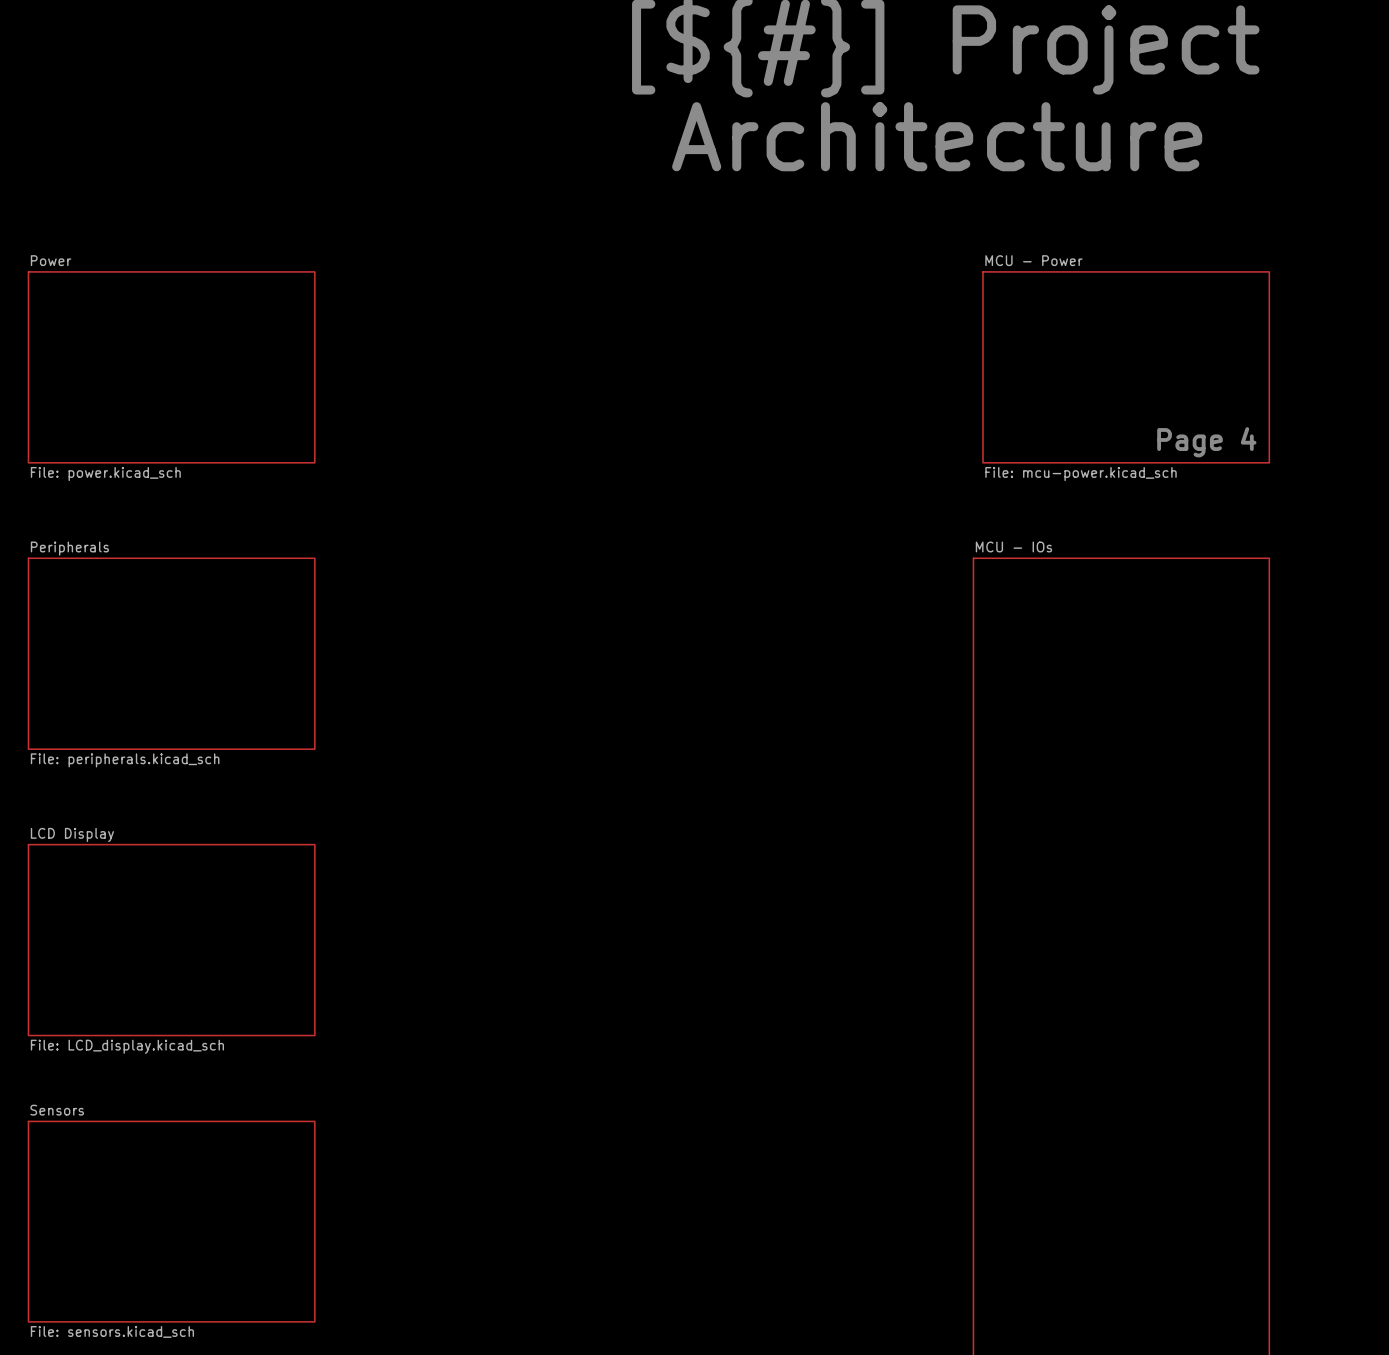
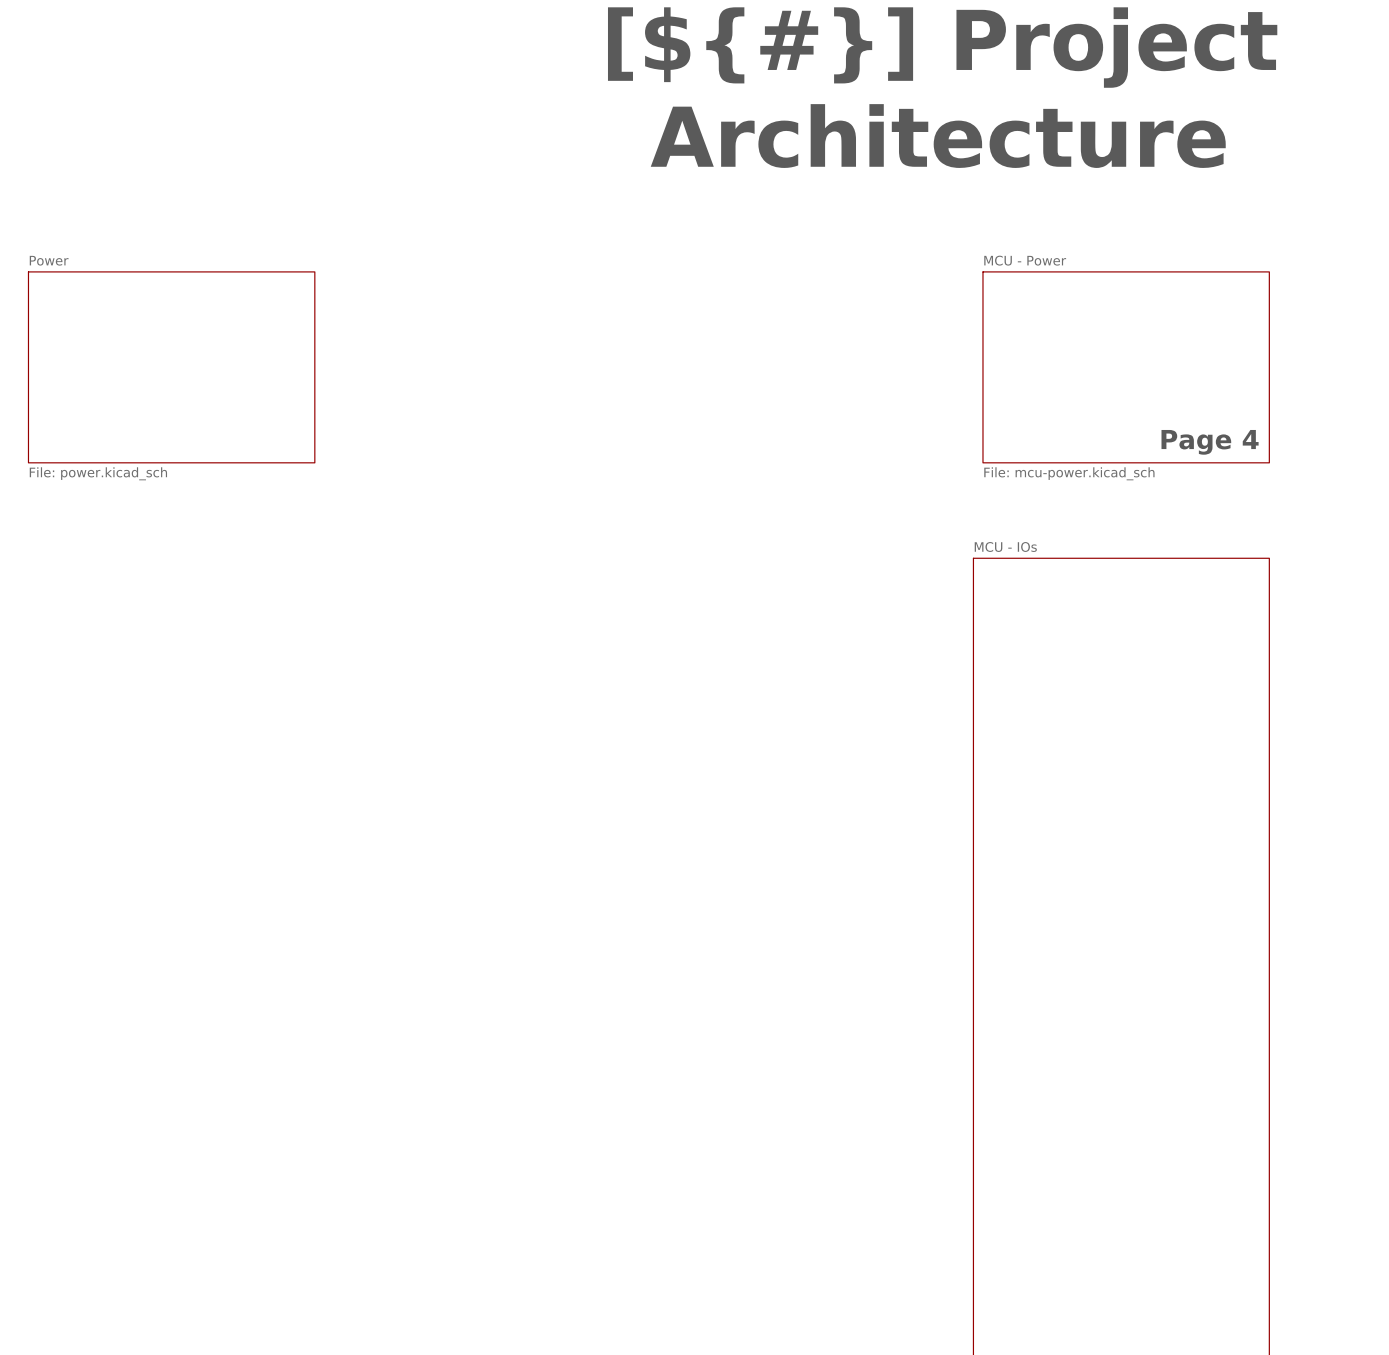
sheet Peripherals: File: peripherals.kicad_sch (171, 653) -> none
sheet LCD Display: File: LCD_display.kicad_sch (171, 940) -> none
sheet Sensors: File: sensors.kicad_sch (171, 1221) -> none

